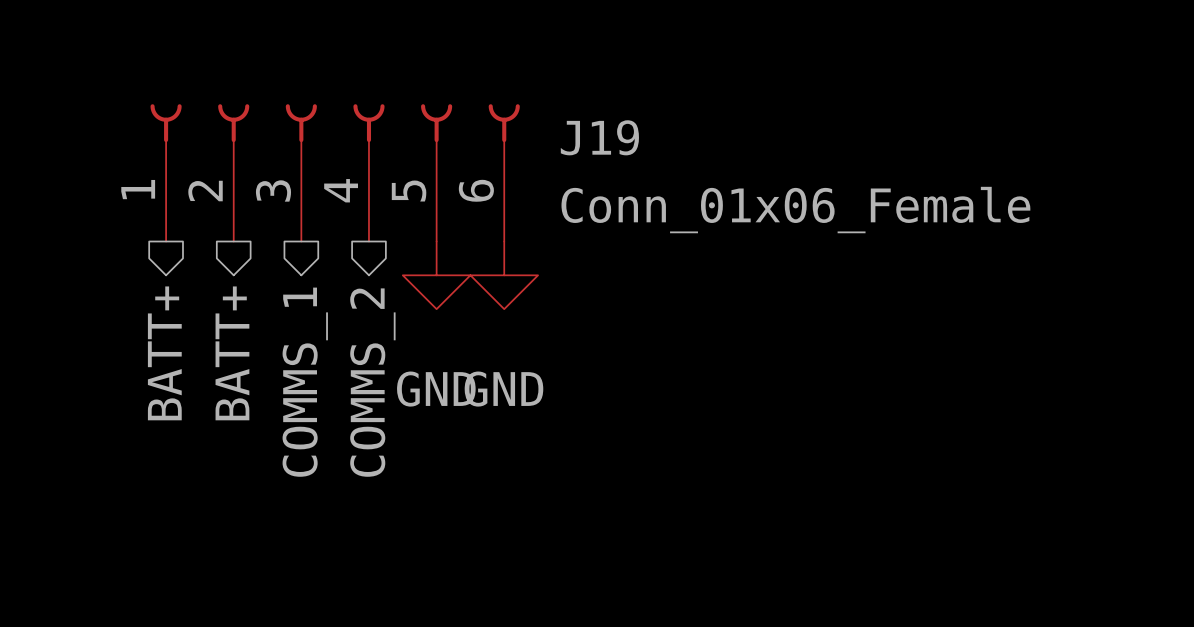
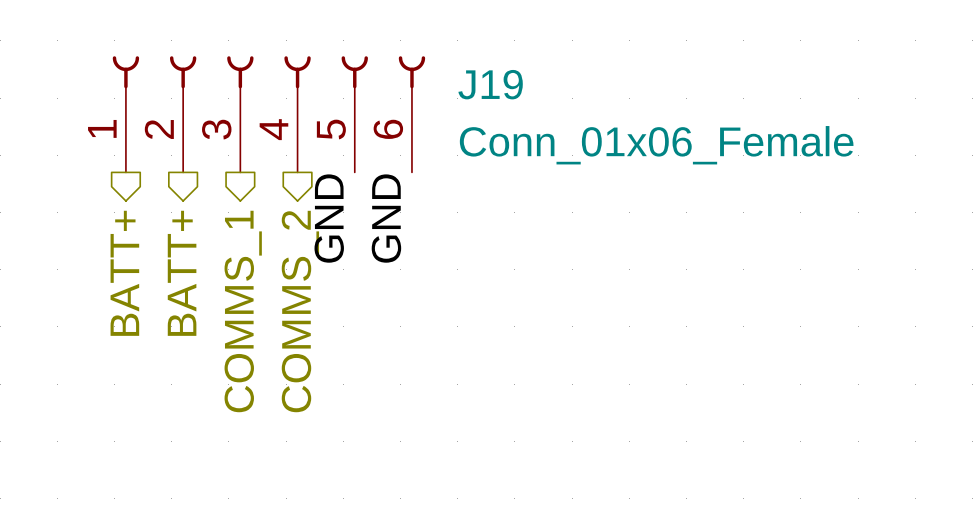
power symbol: GND (436, 275) -> none
power symbol: GND (504, 275) -> none
label: none -> GND (329, 218)
label: none -> GND (386, 218)

